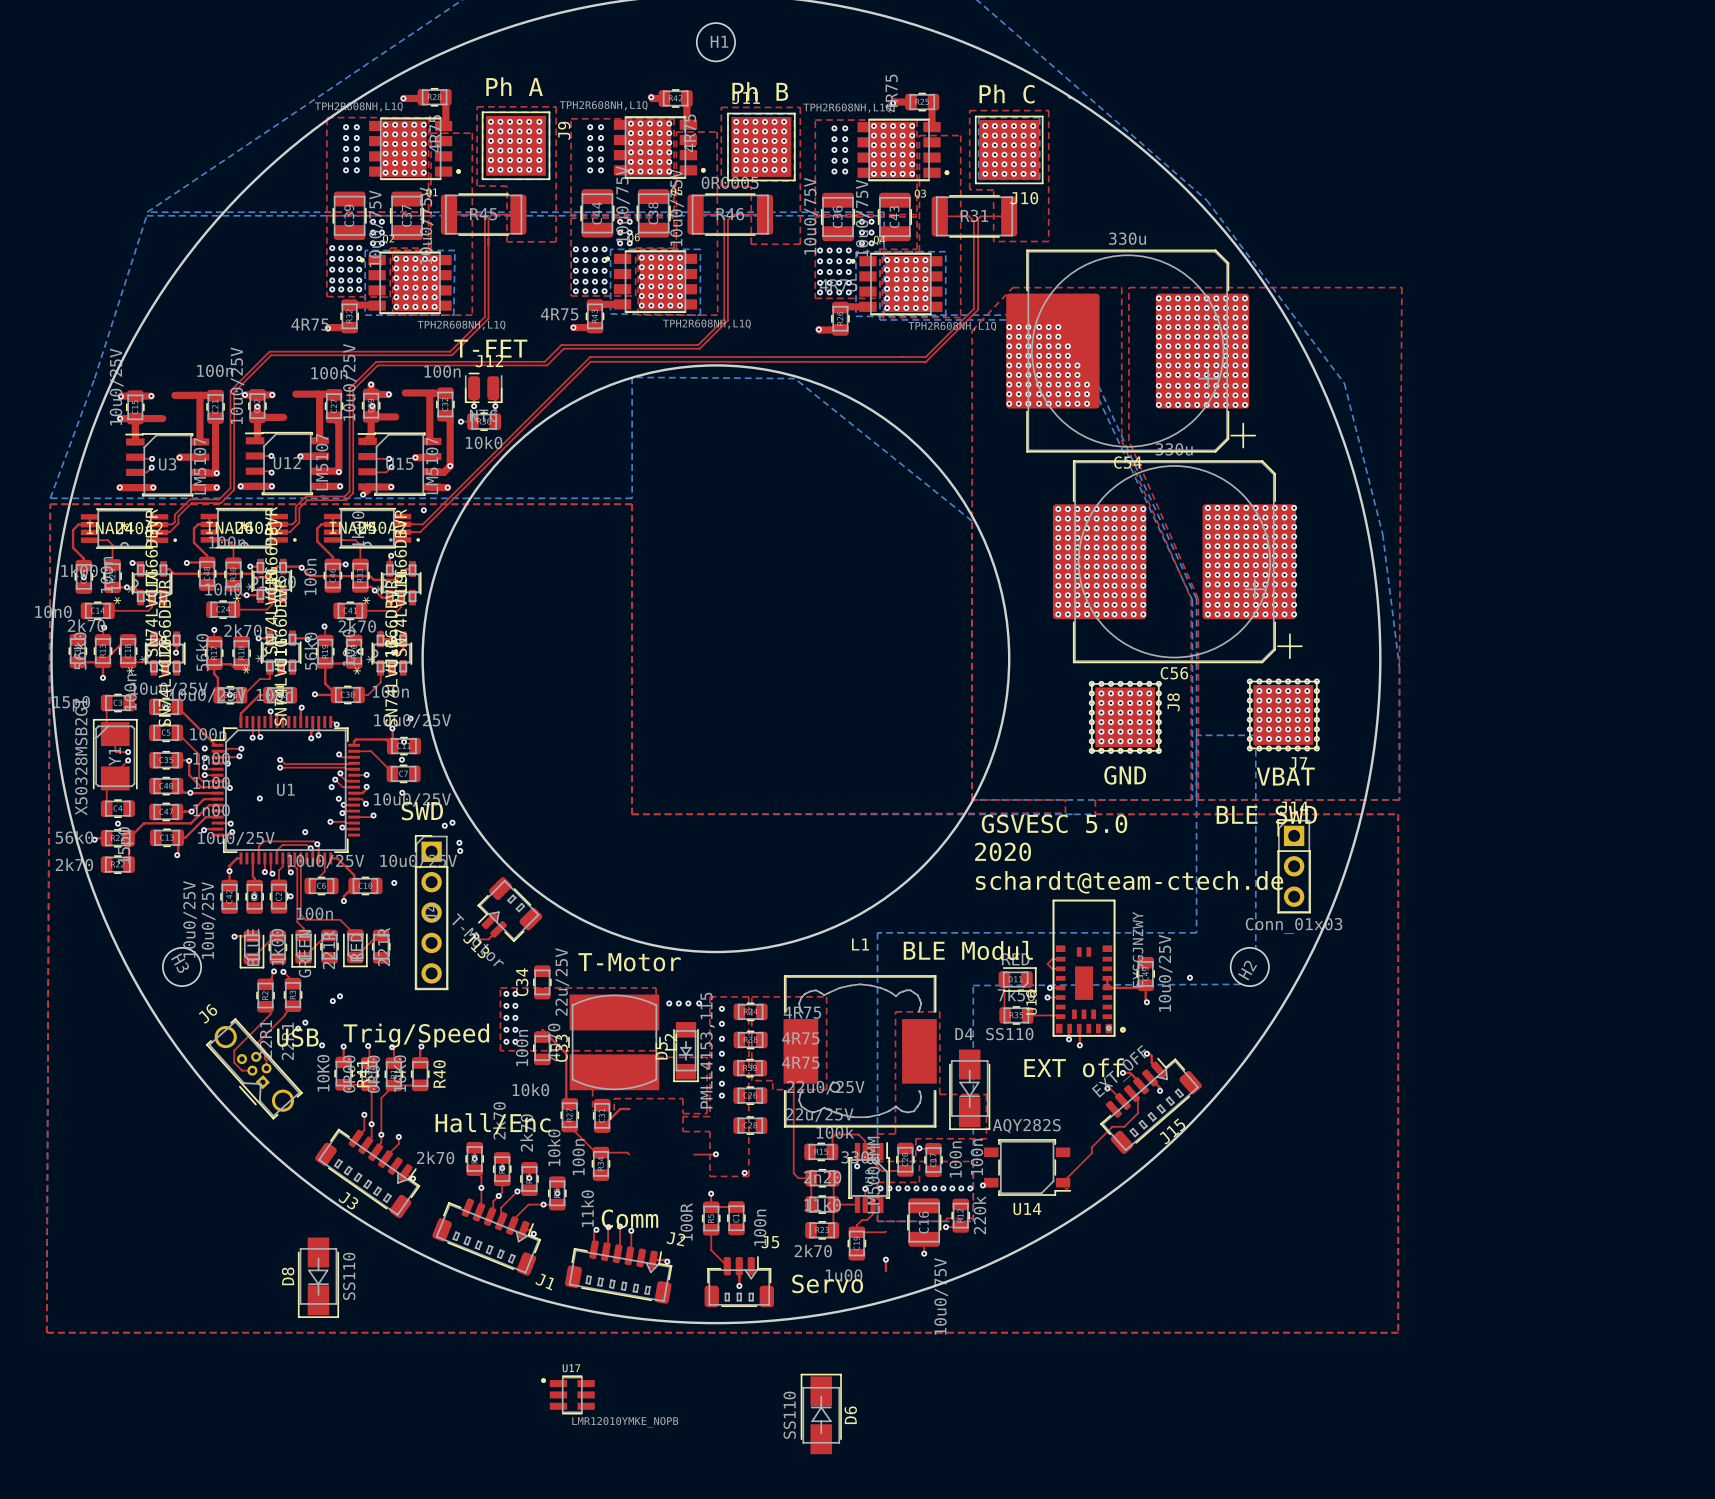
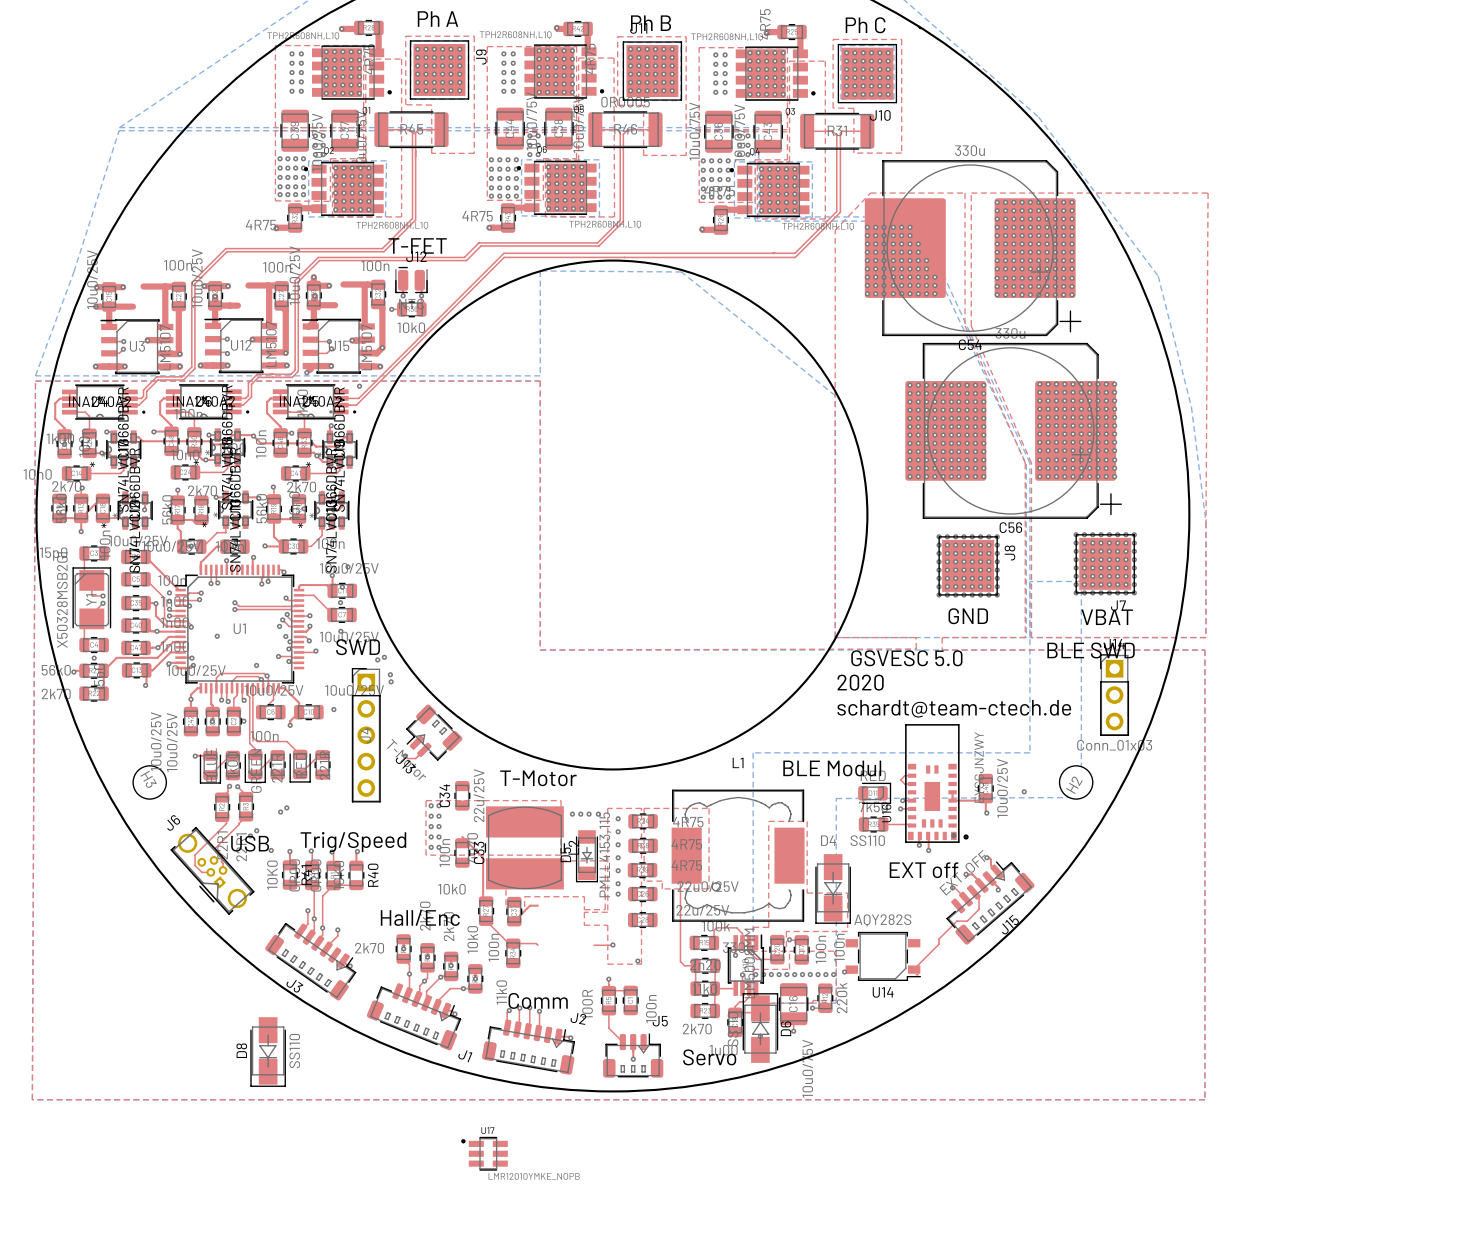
D6 position: (821, 1414) -> (760, 1028)

